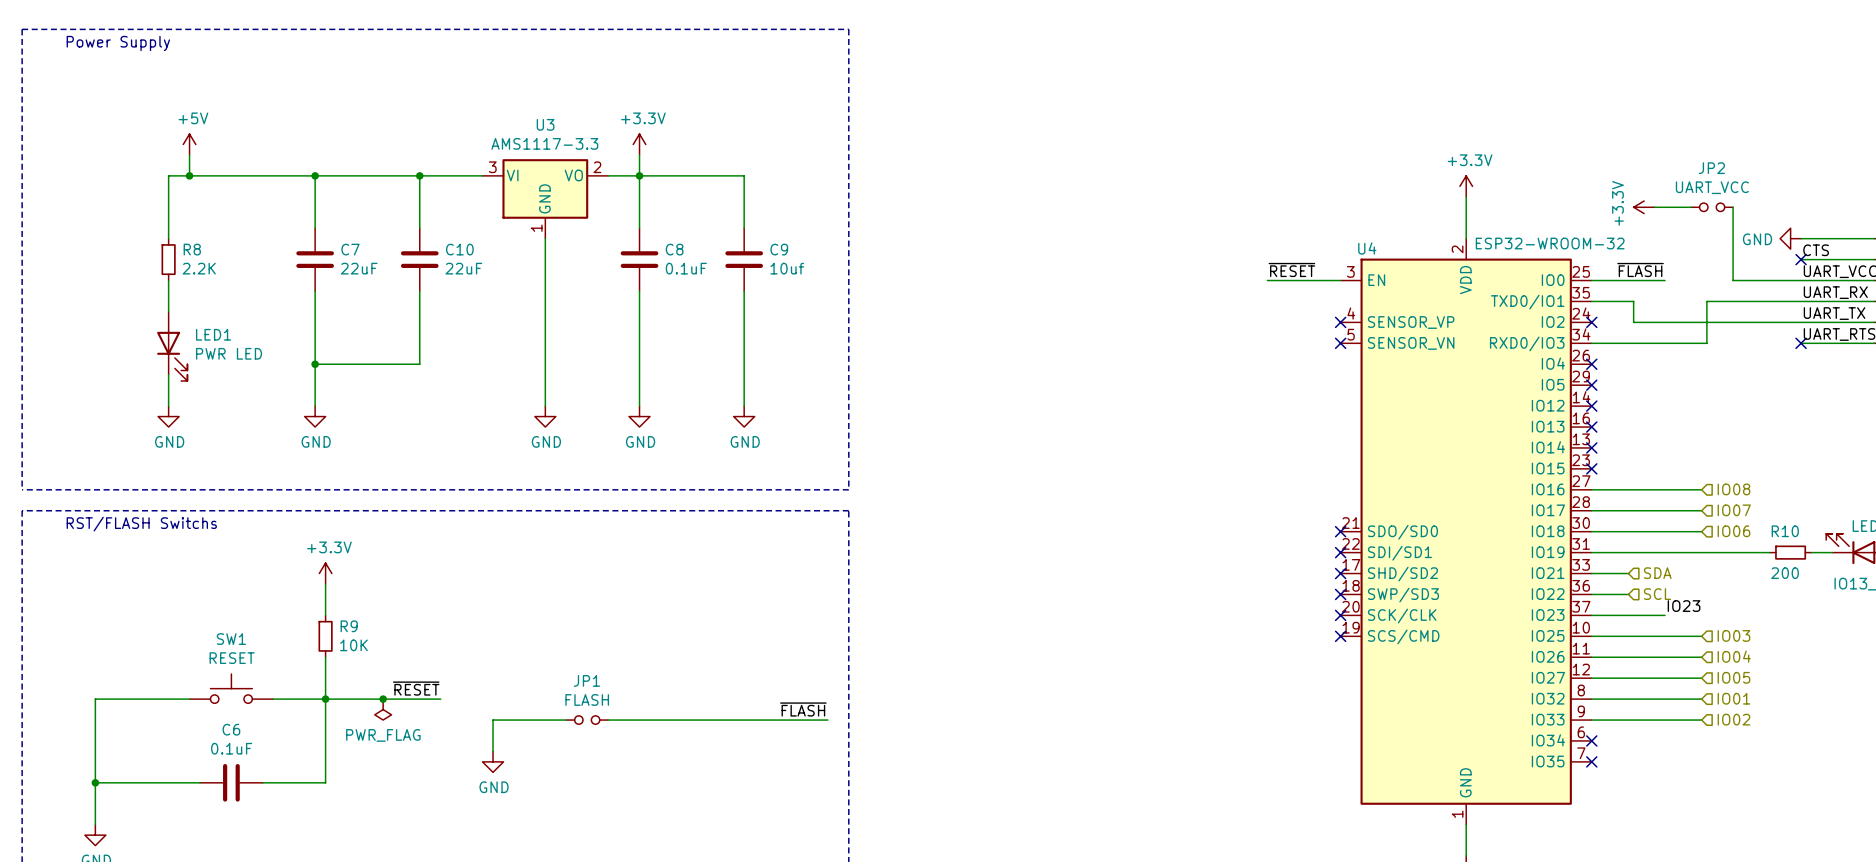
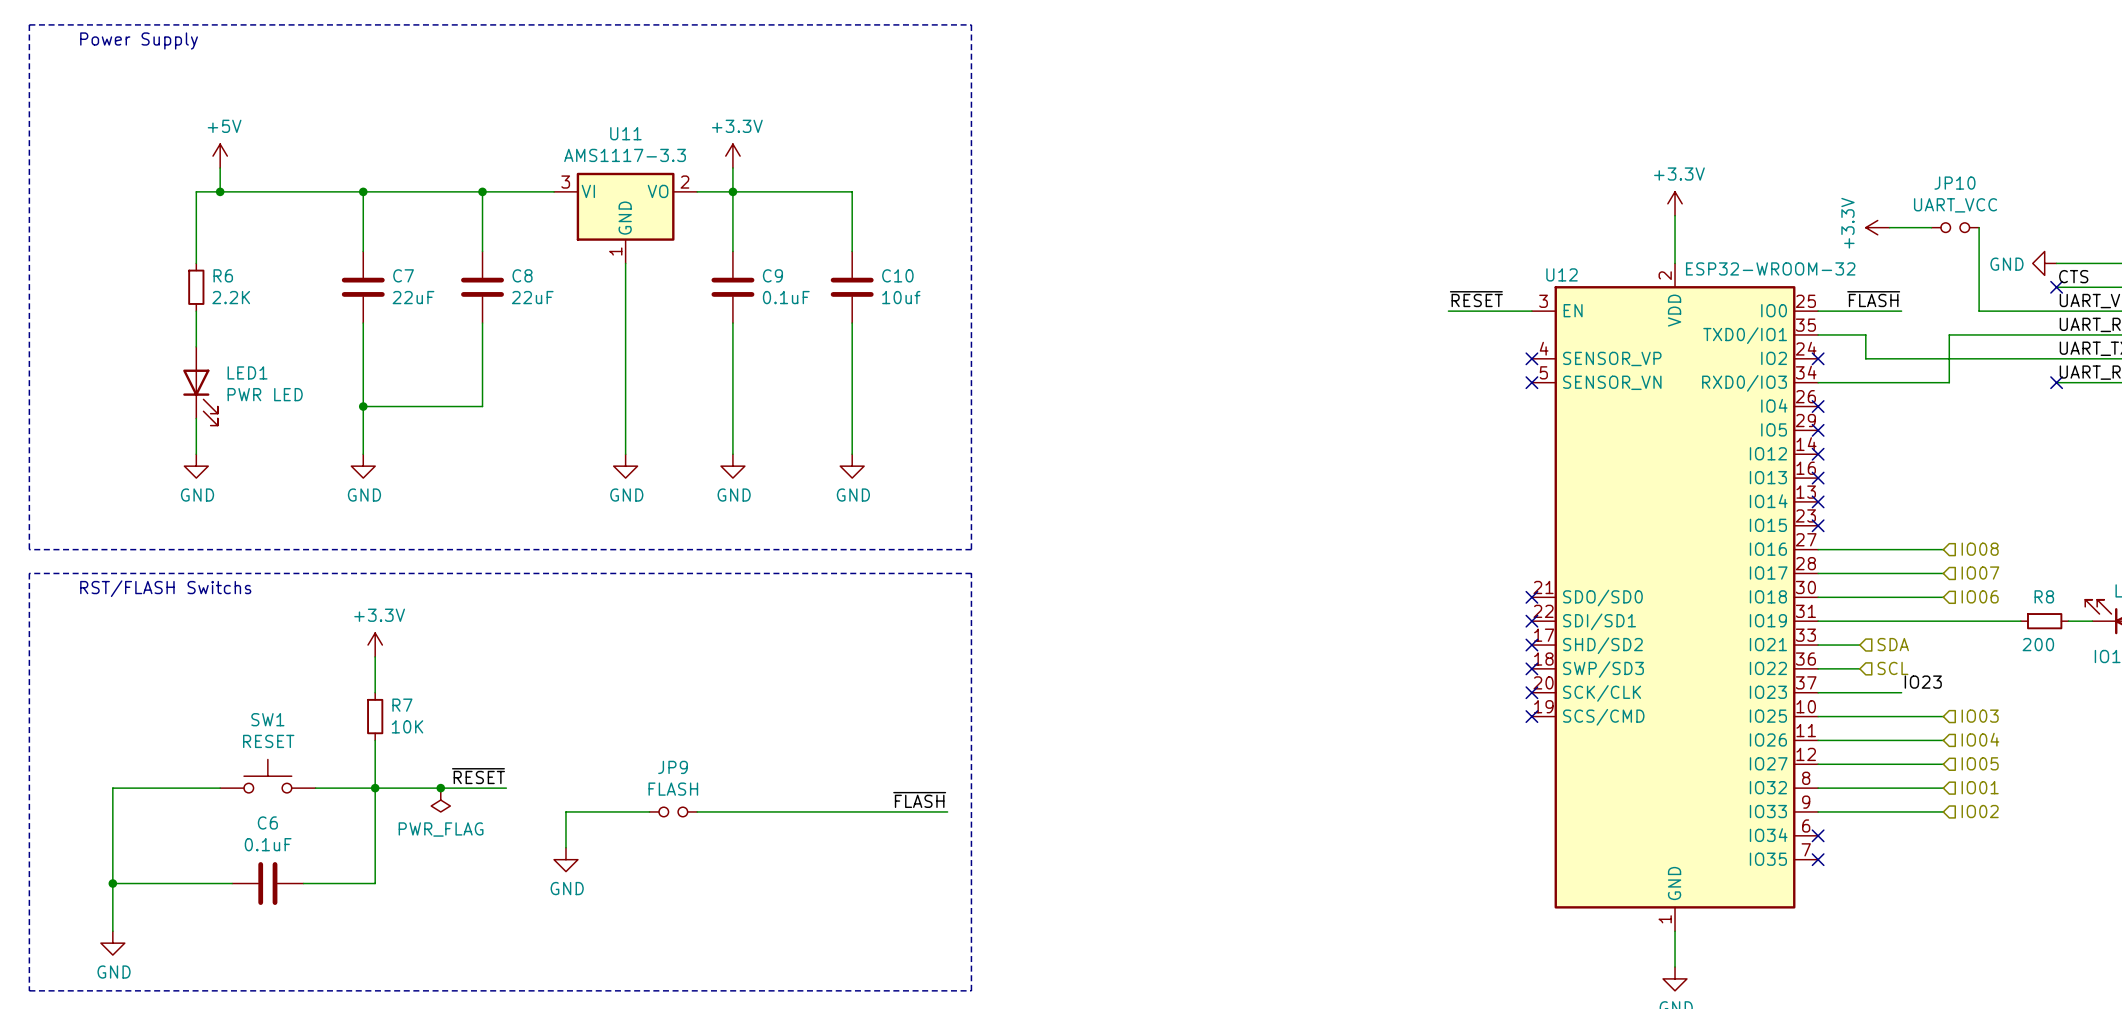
U3 name: U3 (545, 124) -> U11 (625, 133)
JP2 name: JP2 (1711, 168) -> JP10 (1954, 183)
U4 name: U4 (1367, 248) -> U12 (1562, 274)
R8 name: R8 (192, 249) -> R6 (223, 275)
C10 name: C10 (459, 249) -> C8 (522, 275)
C8 name: C8 (674, 249) -> C9 (772, 275)
C9 name: C9 (779, 249) -> C10 (897, 275)
R10 name: R10 (1785, 531) -> R8 (2044, 596)
R9 name: R9 (349, 626) -> R7 (402, 705)
JP1 name: JP1 (586, 680) -> JP9 (673, 767)

